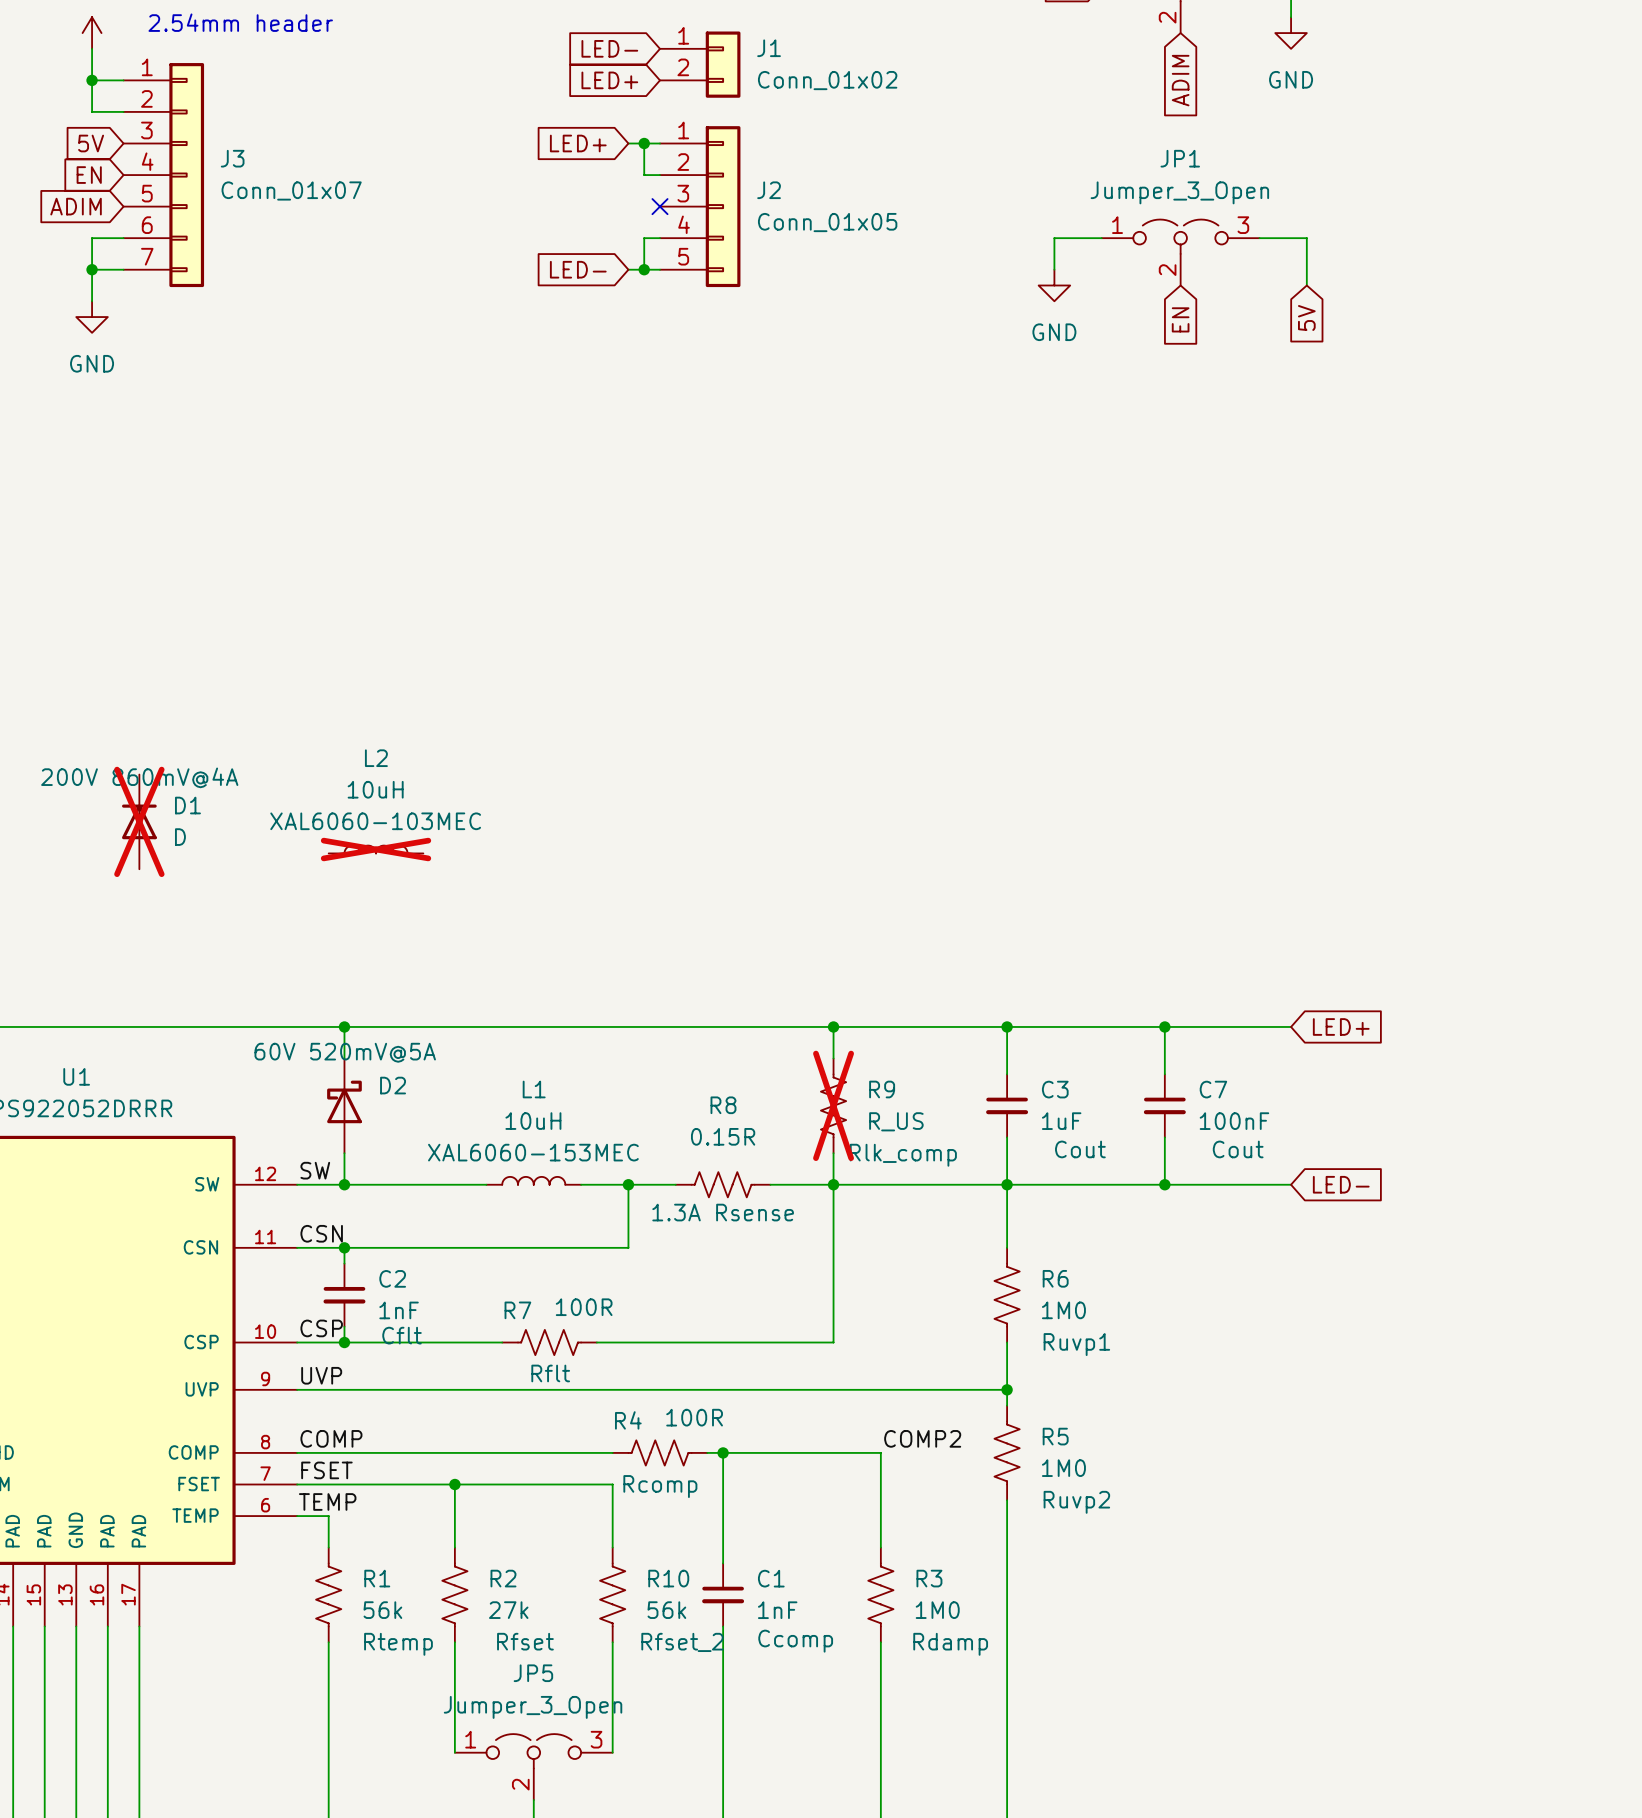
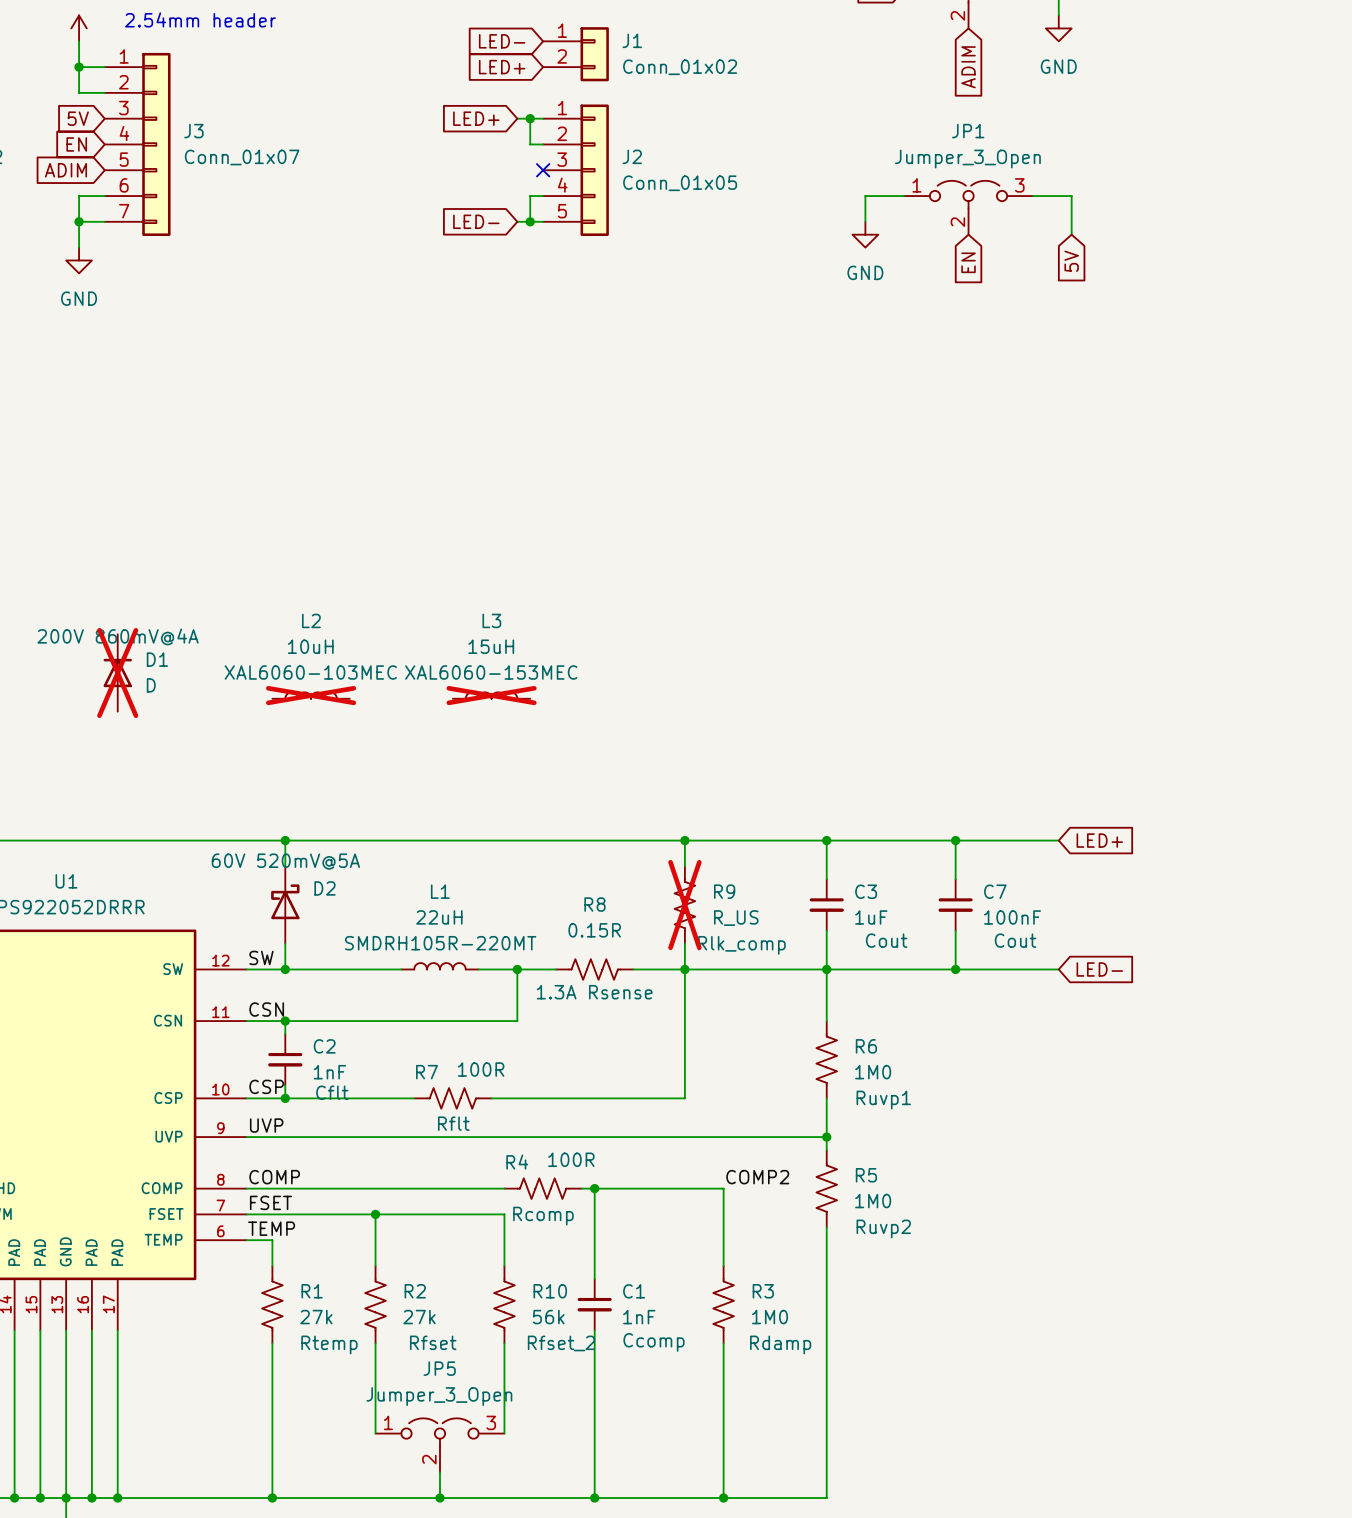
L3: none -> 15uH (491, 695)
L1 value: 10uH (533, 1121) -> 22uH (439, 917)
L1 text: XAL6060-153MEC (533, 1152) -> SMDRH105R-220MT (440, 943)
R1 value: 56k (382, 1610) -> 27k (316, 1317)

